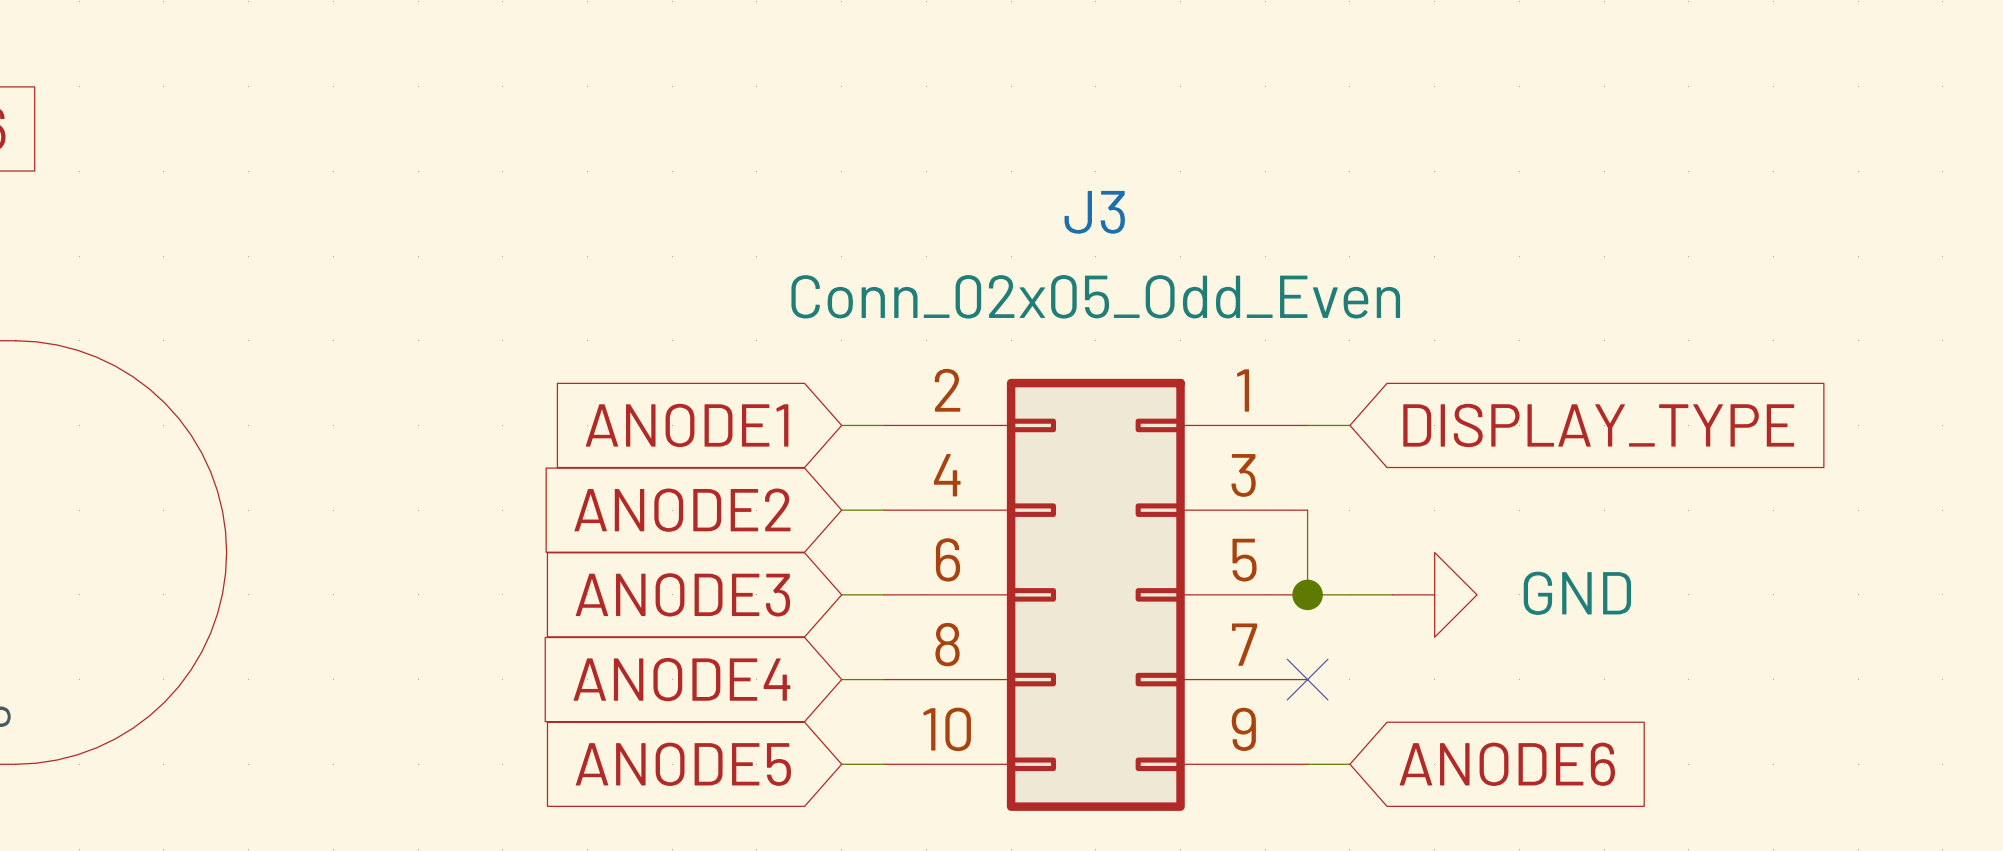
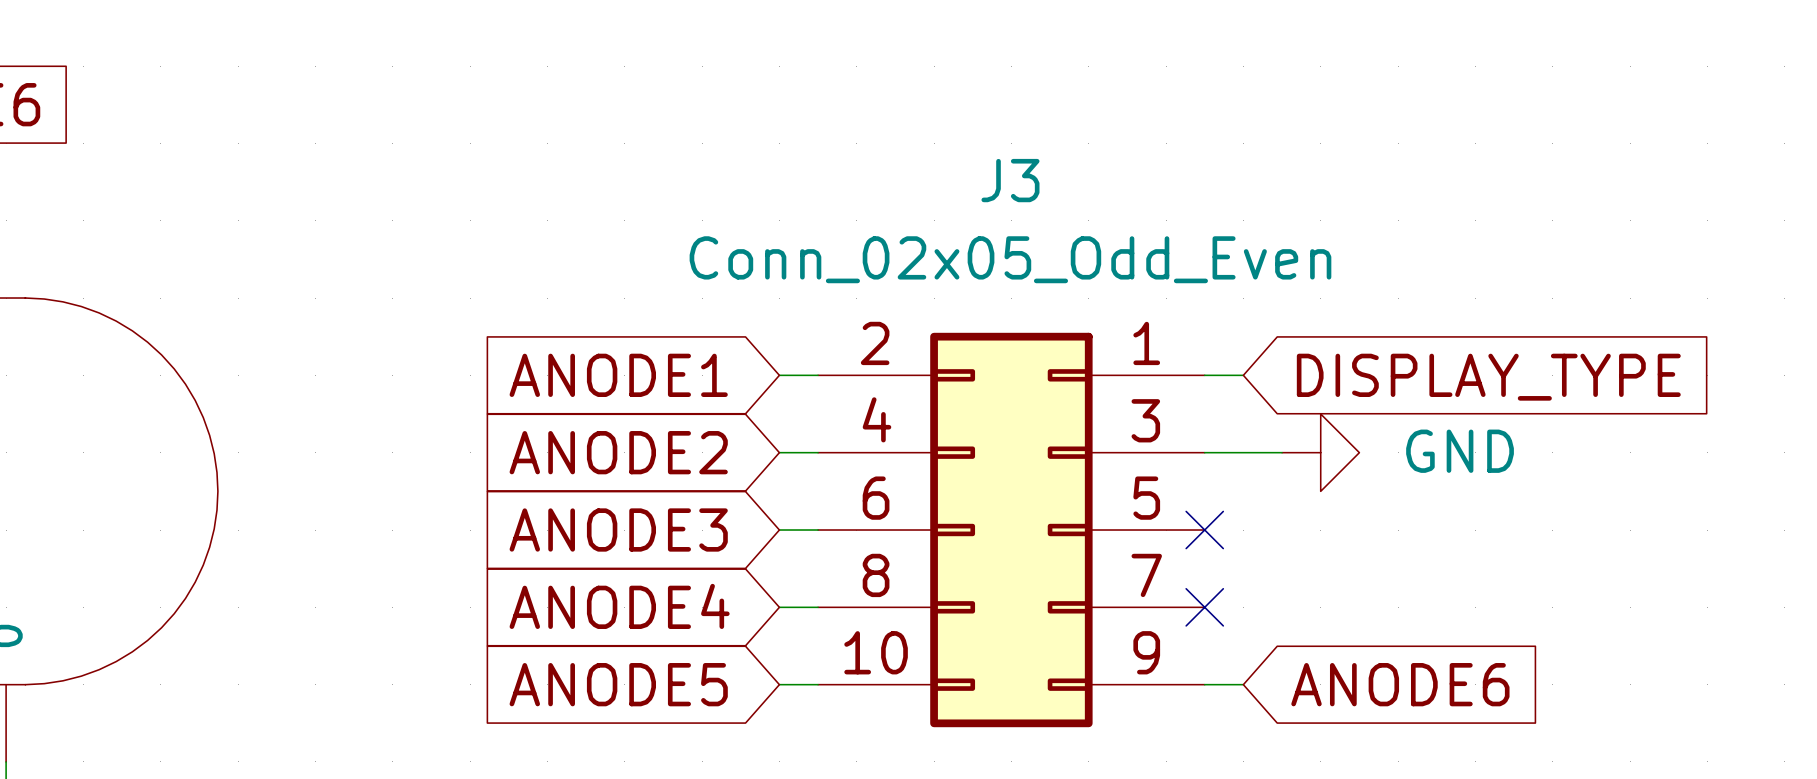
wire: (1307, 510) (1307, 594) (1392, 594) -> (1204, 452) (1282, 452)
junction: (1307, 594) -> none
no-connect mark: none -> (1204, 530)
power symbol position: GND (1434, 594) -> GND (1320, 452)

